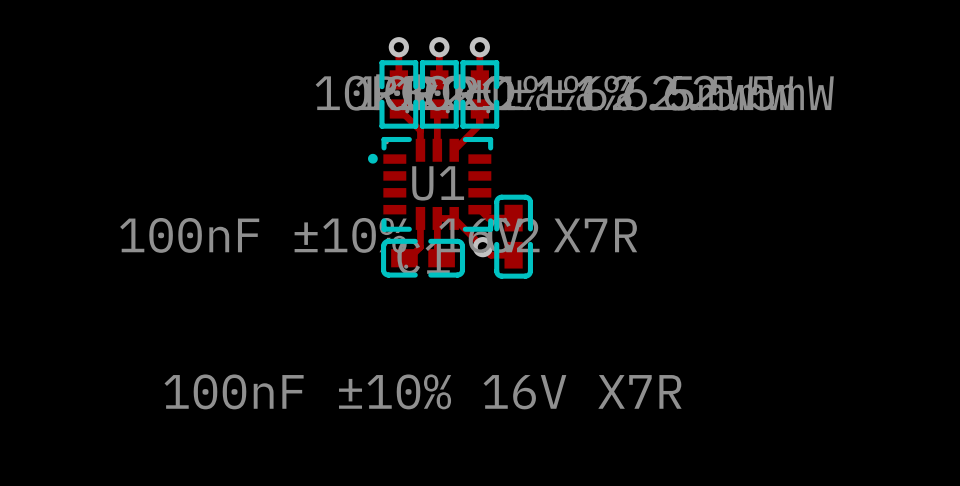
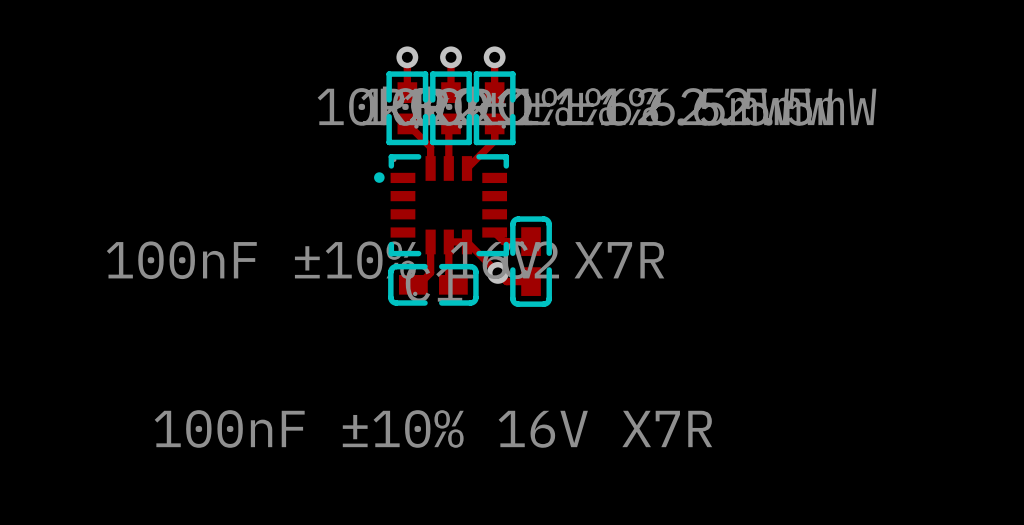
U1 name: U1 (438, 183) -> none

